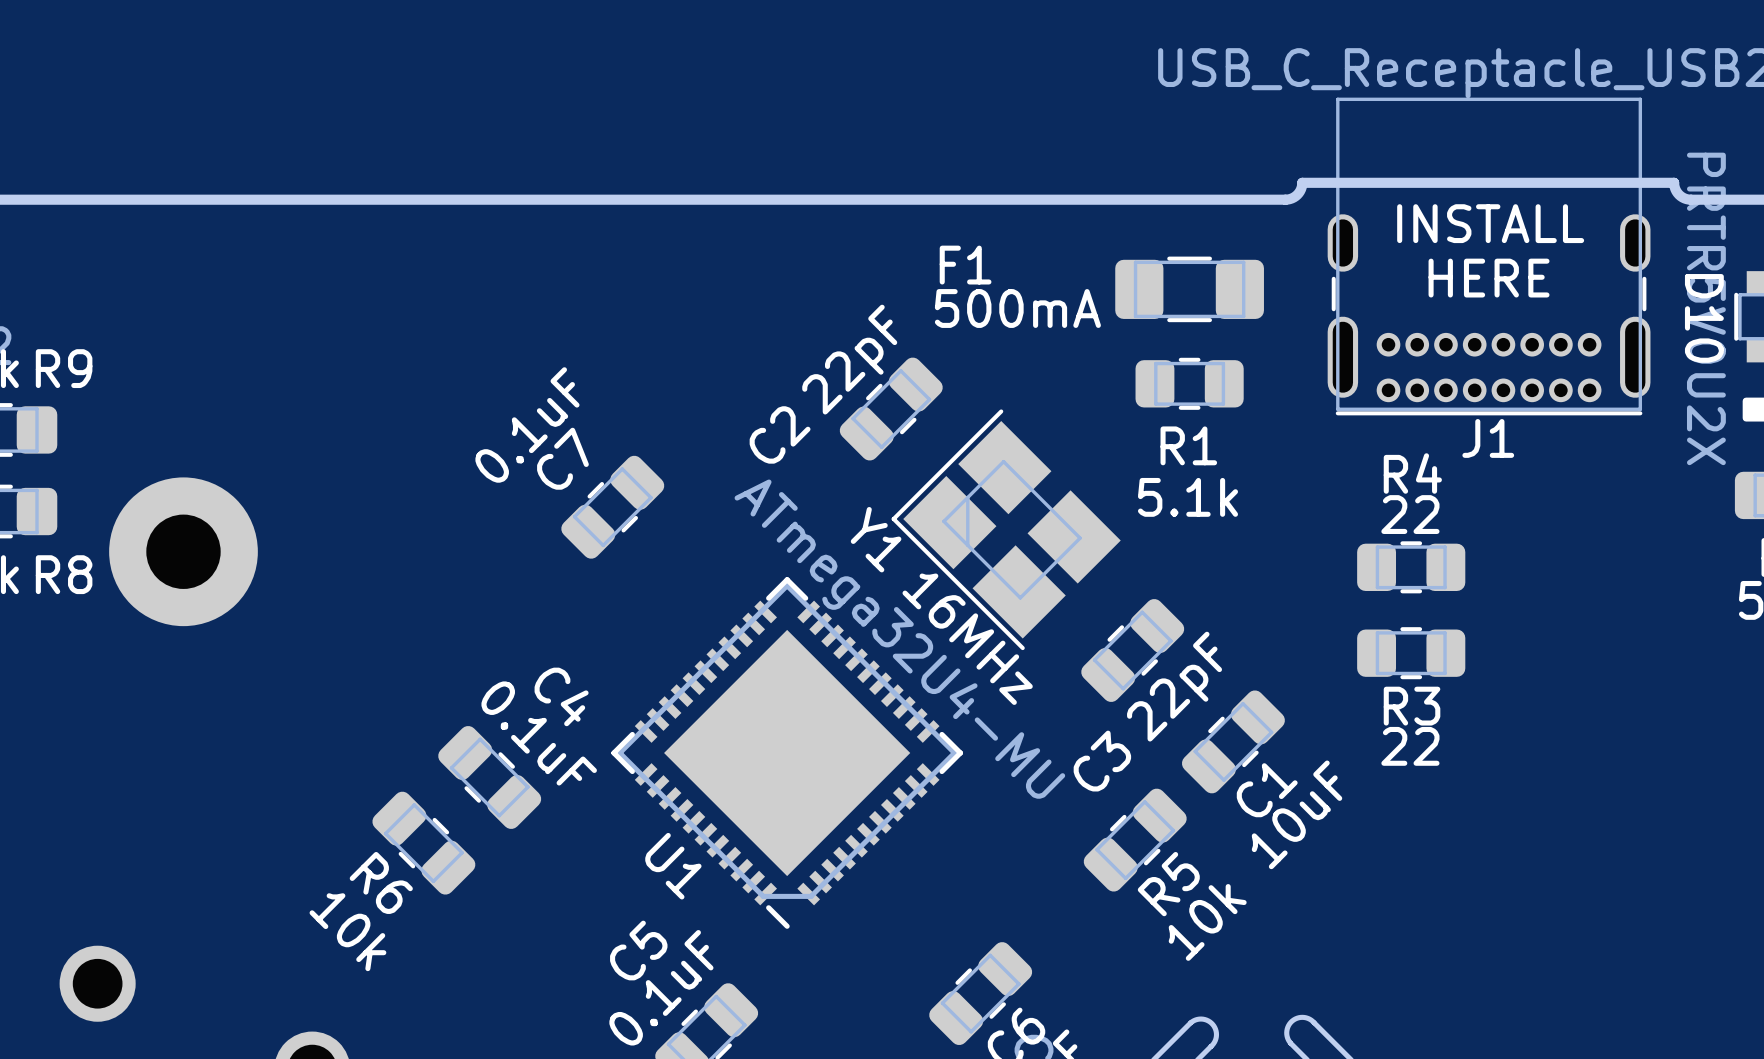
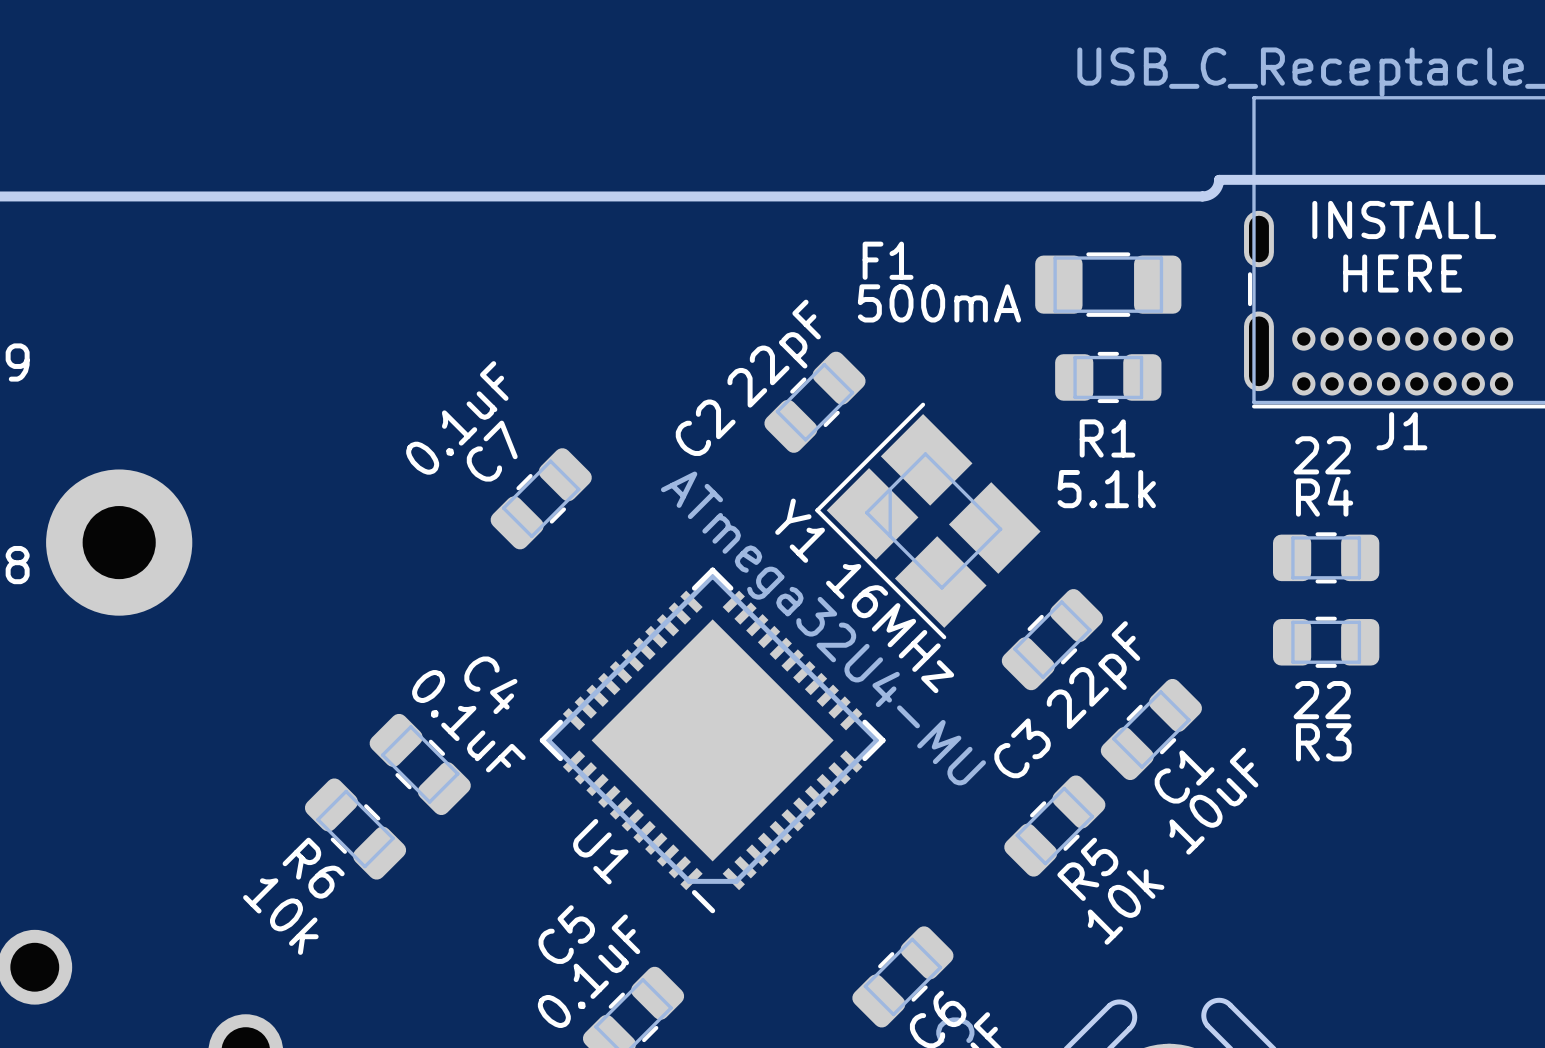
R4 name position: R4 (1412, 473) -> R4 (1324, 496)
R4 value position: 22 (1410, 514) -> 22 (1322, 455)
R3 name position: R3 (1412, 706) -> R3 (1323, 742)
R3 value position: 22 (1410, 746) -> 22 (1322, 700)

